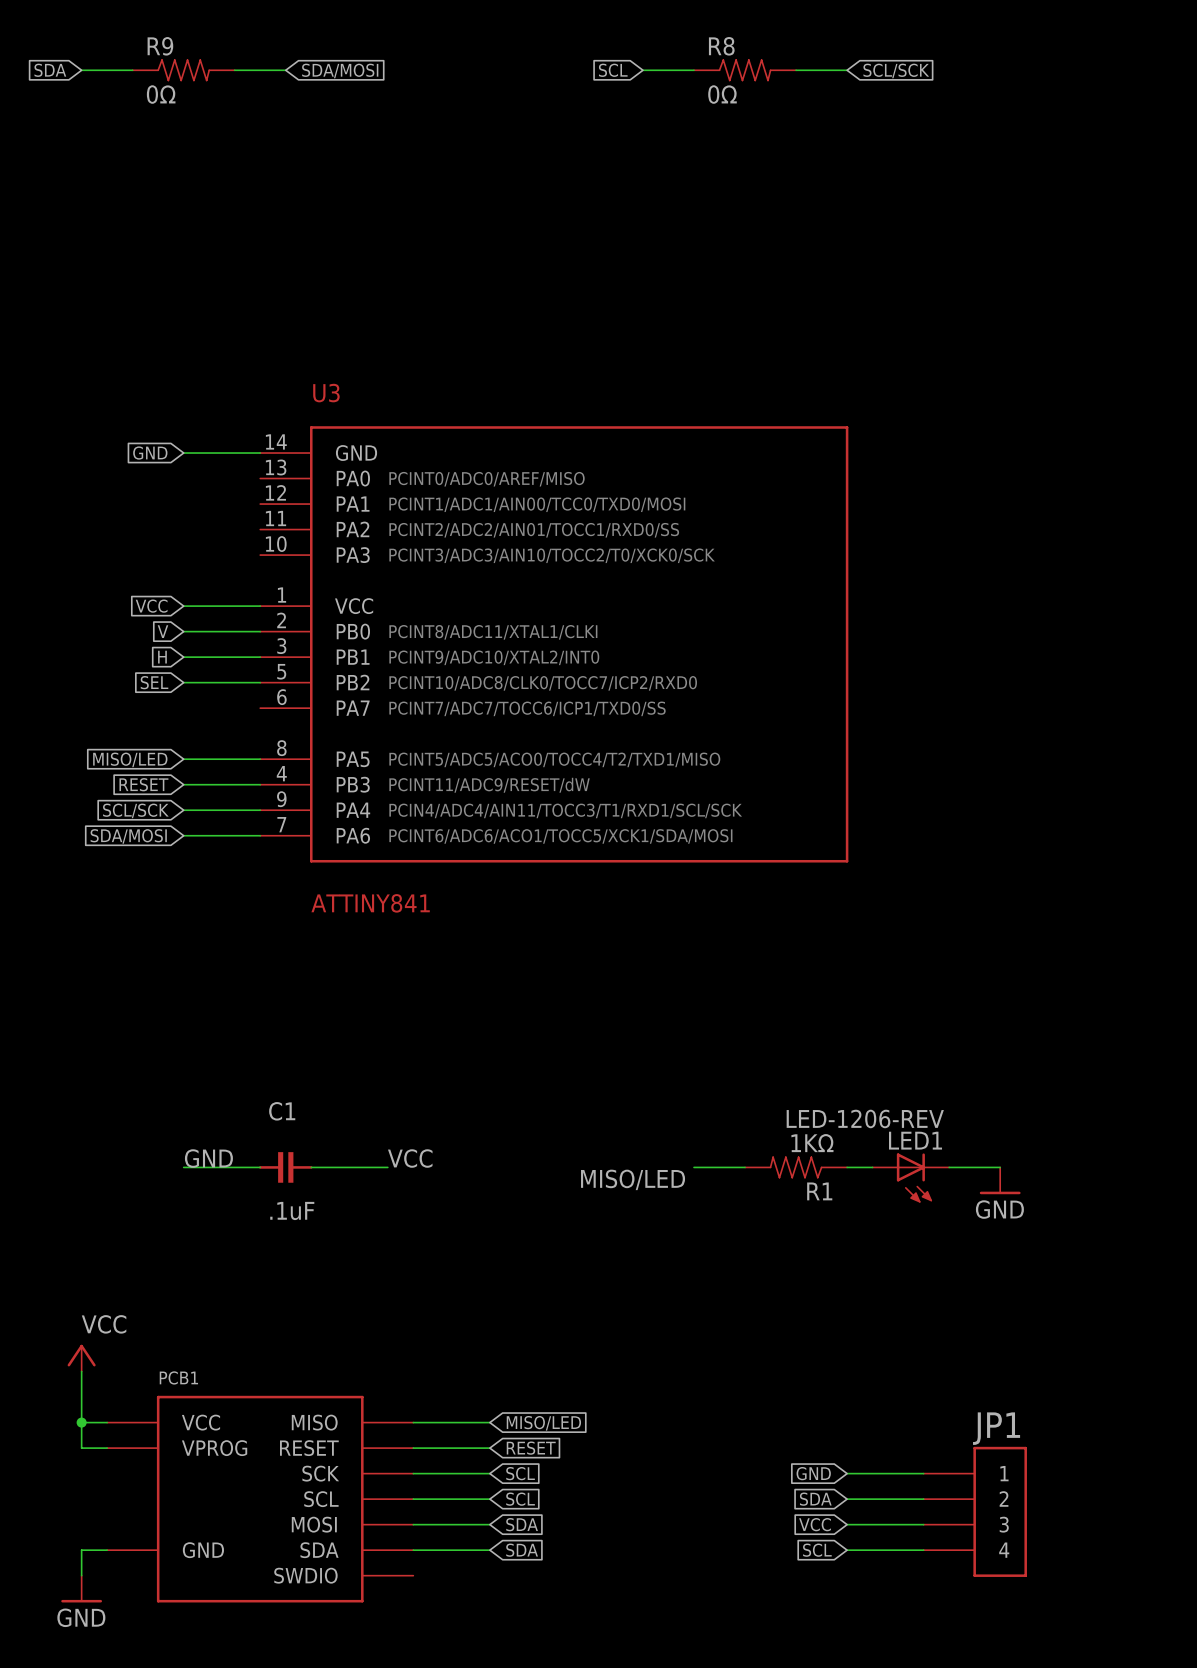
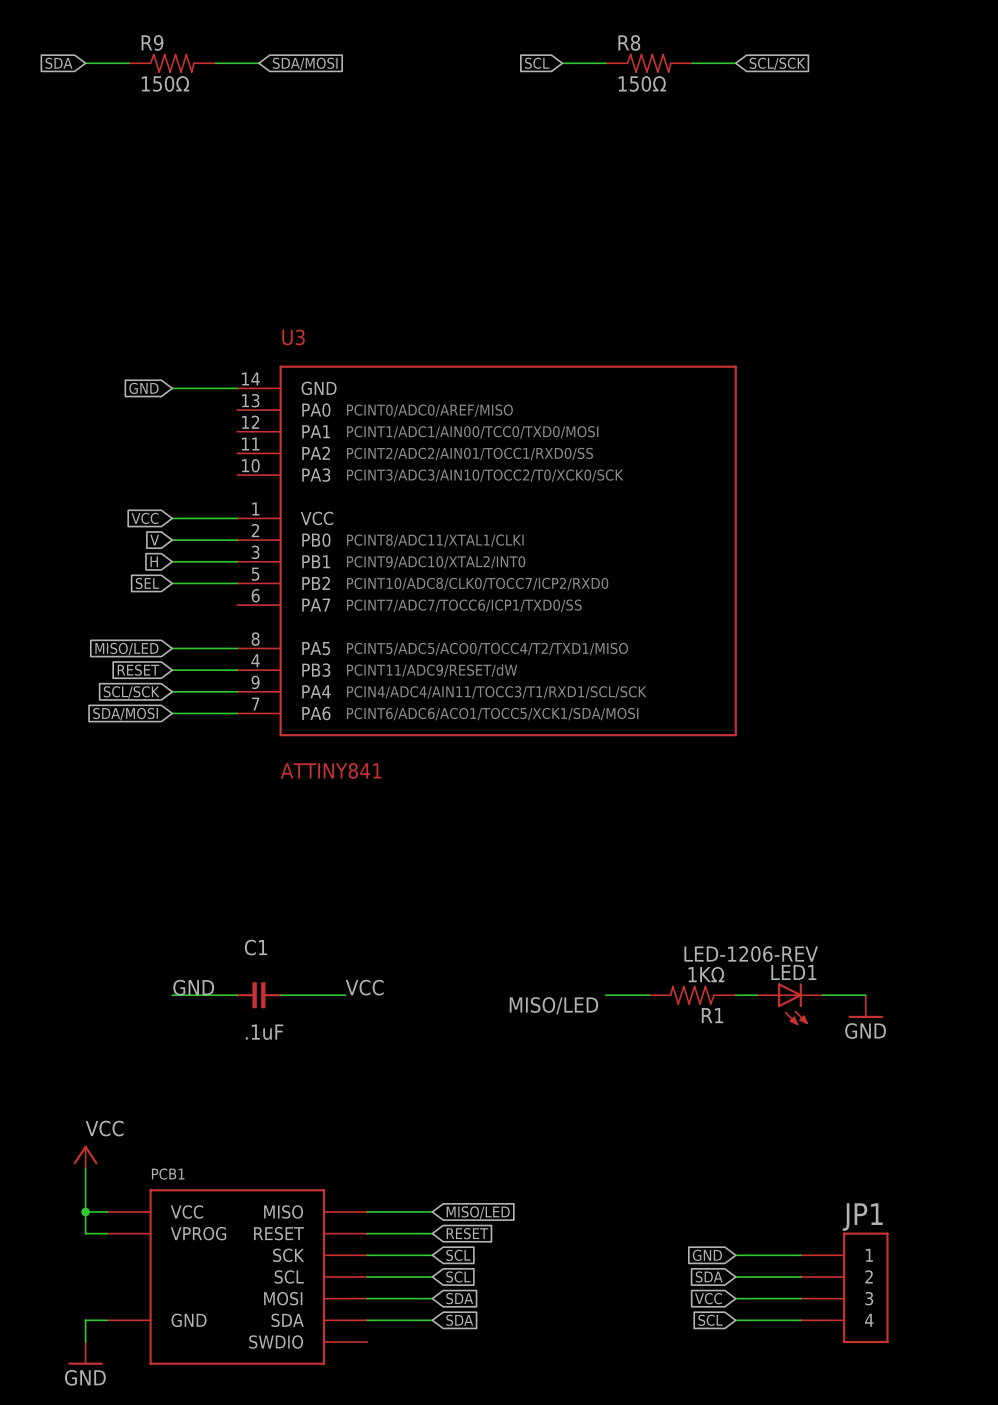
R9 value: 0Ω (161, 94) -> 150Ω (165, 83)
R8 value: 0Ω (722, 94) -> 150Ω (642, 83)

